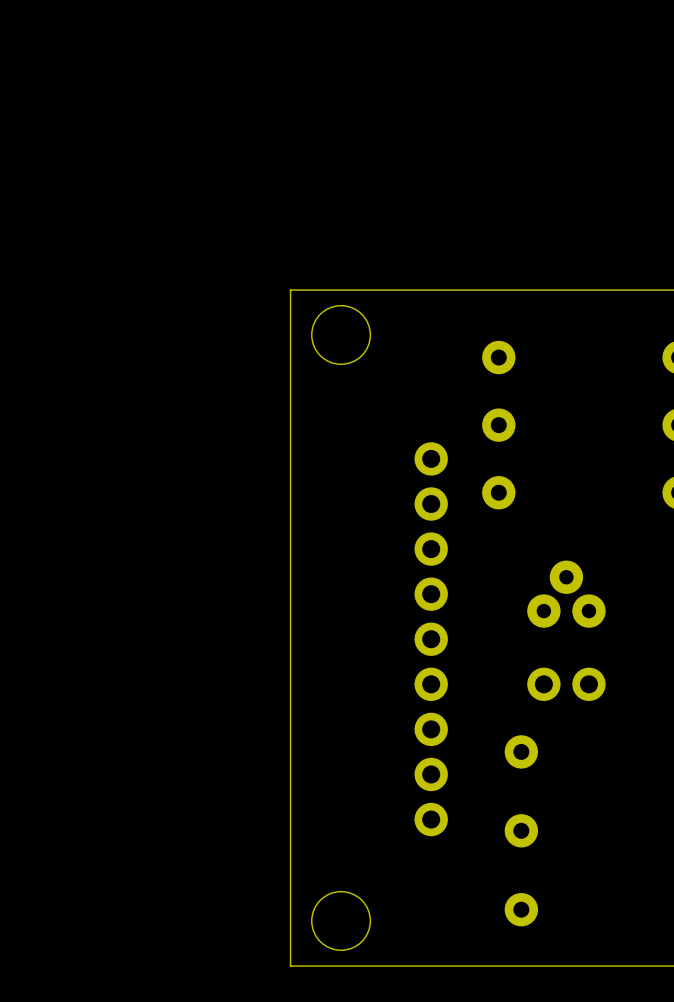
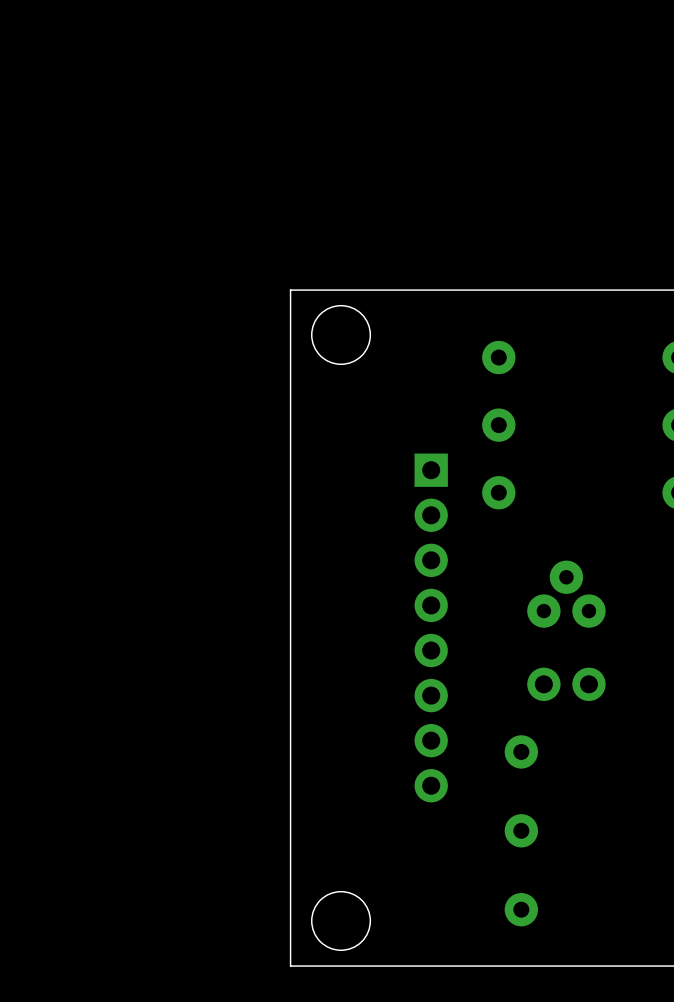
part footprint: [414, 442, 448, 837] -> [414, 453, 448, 803]

